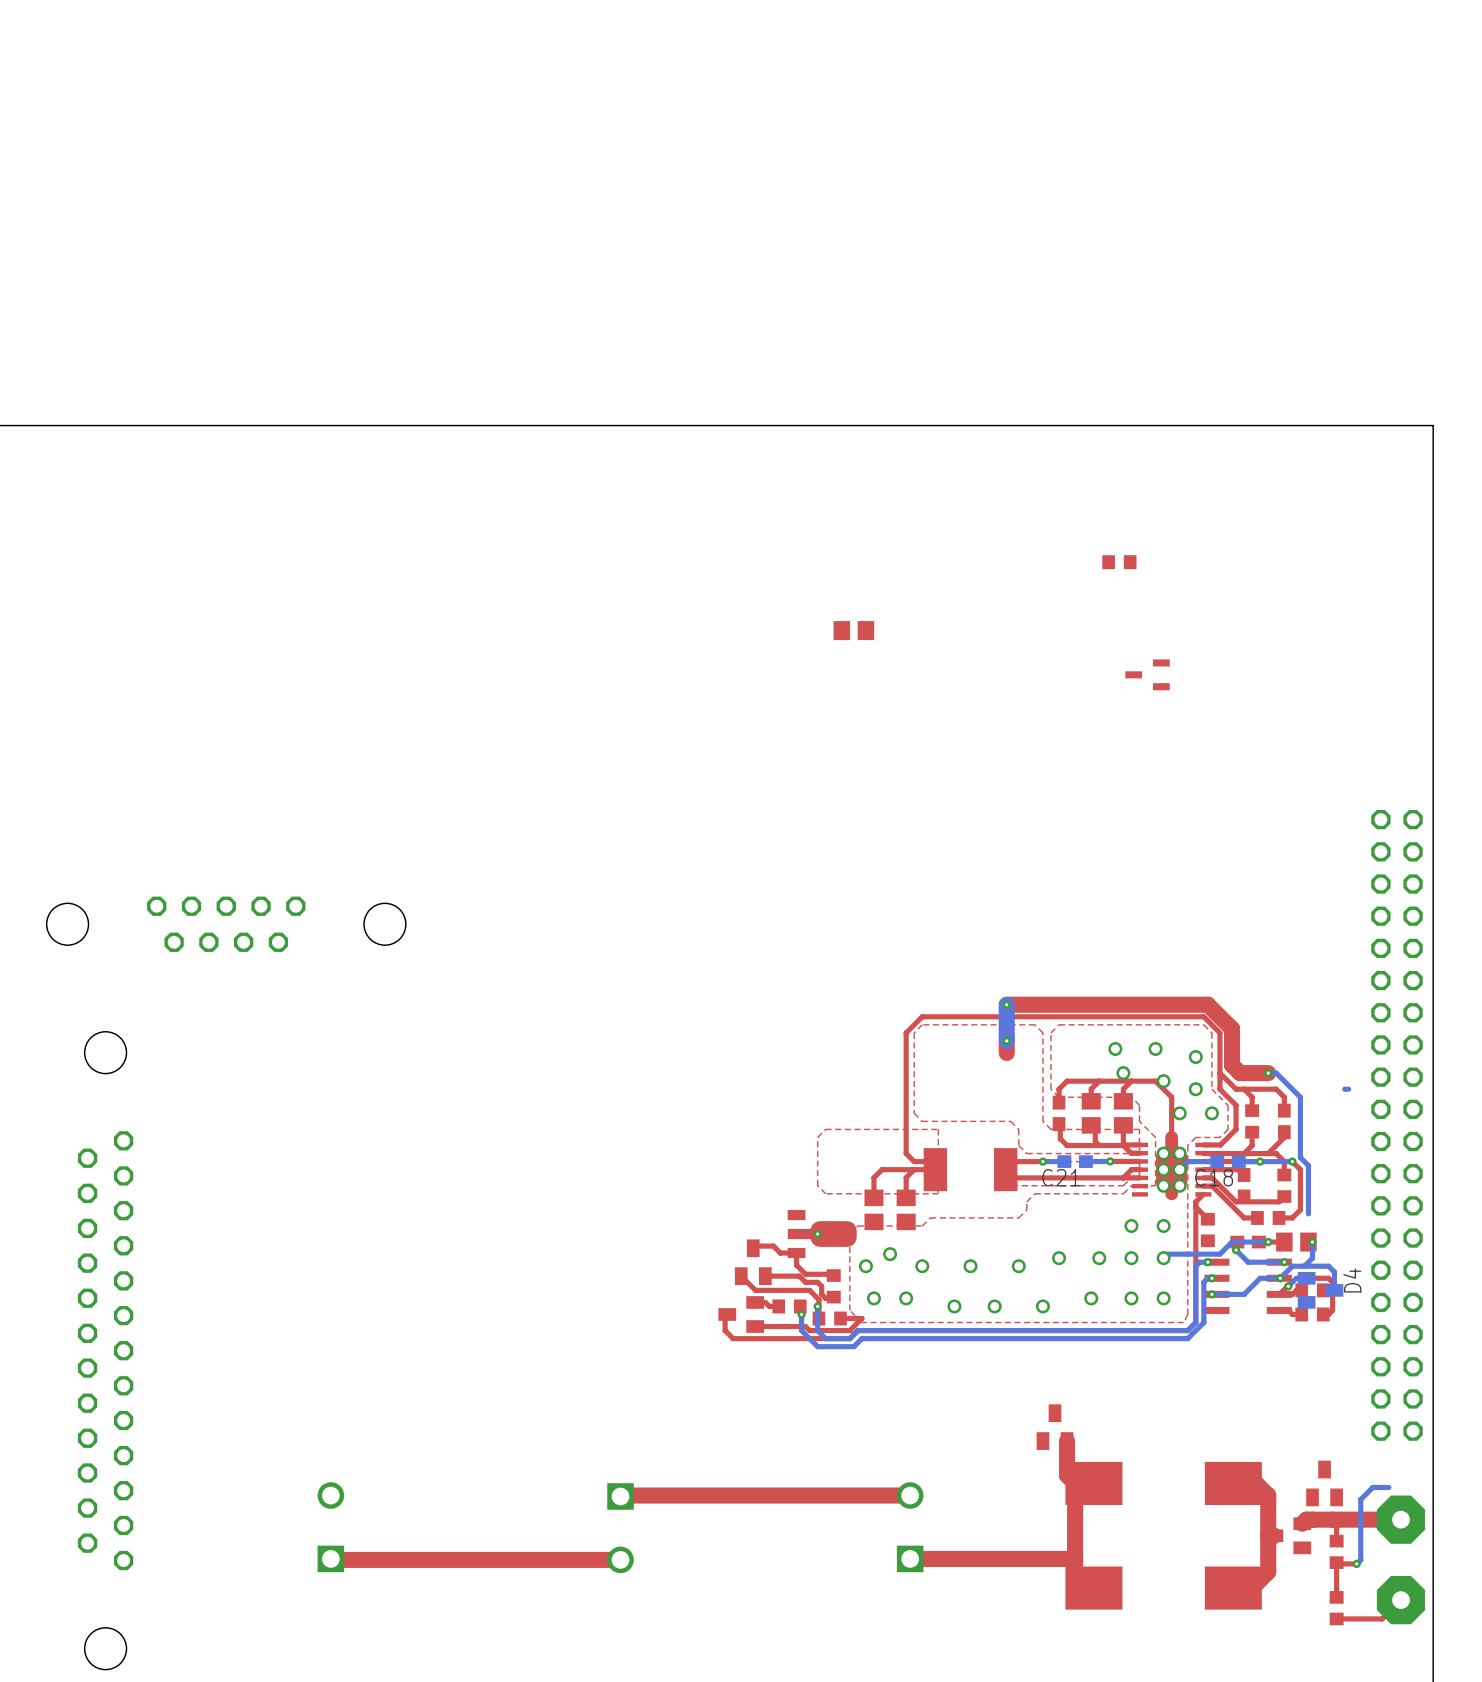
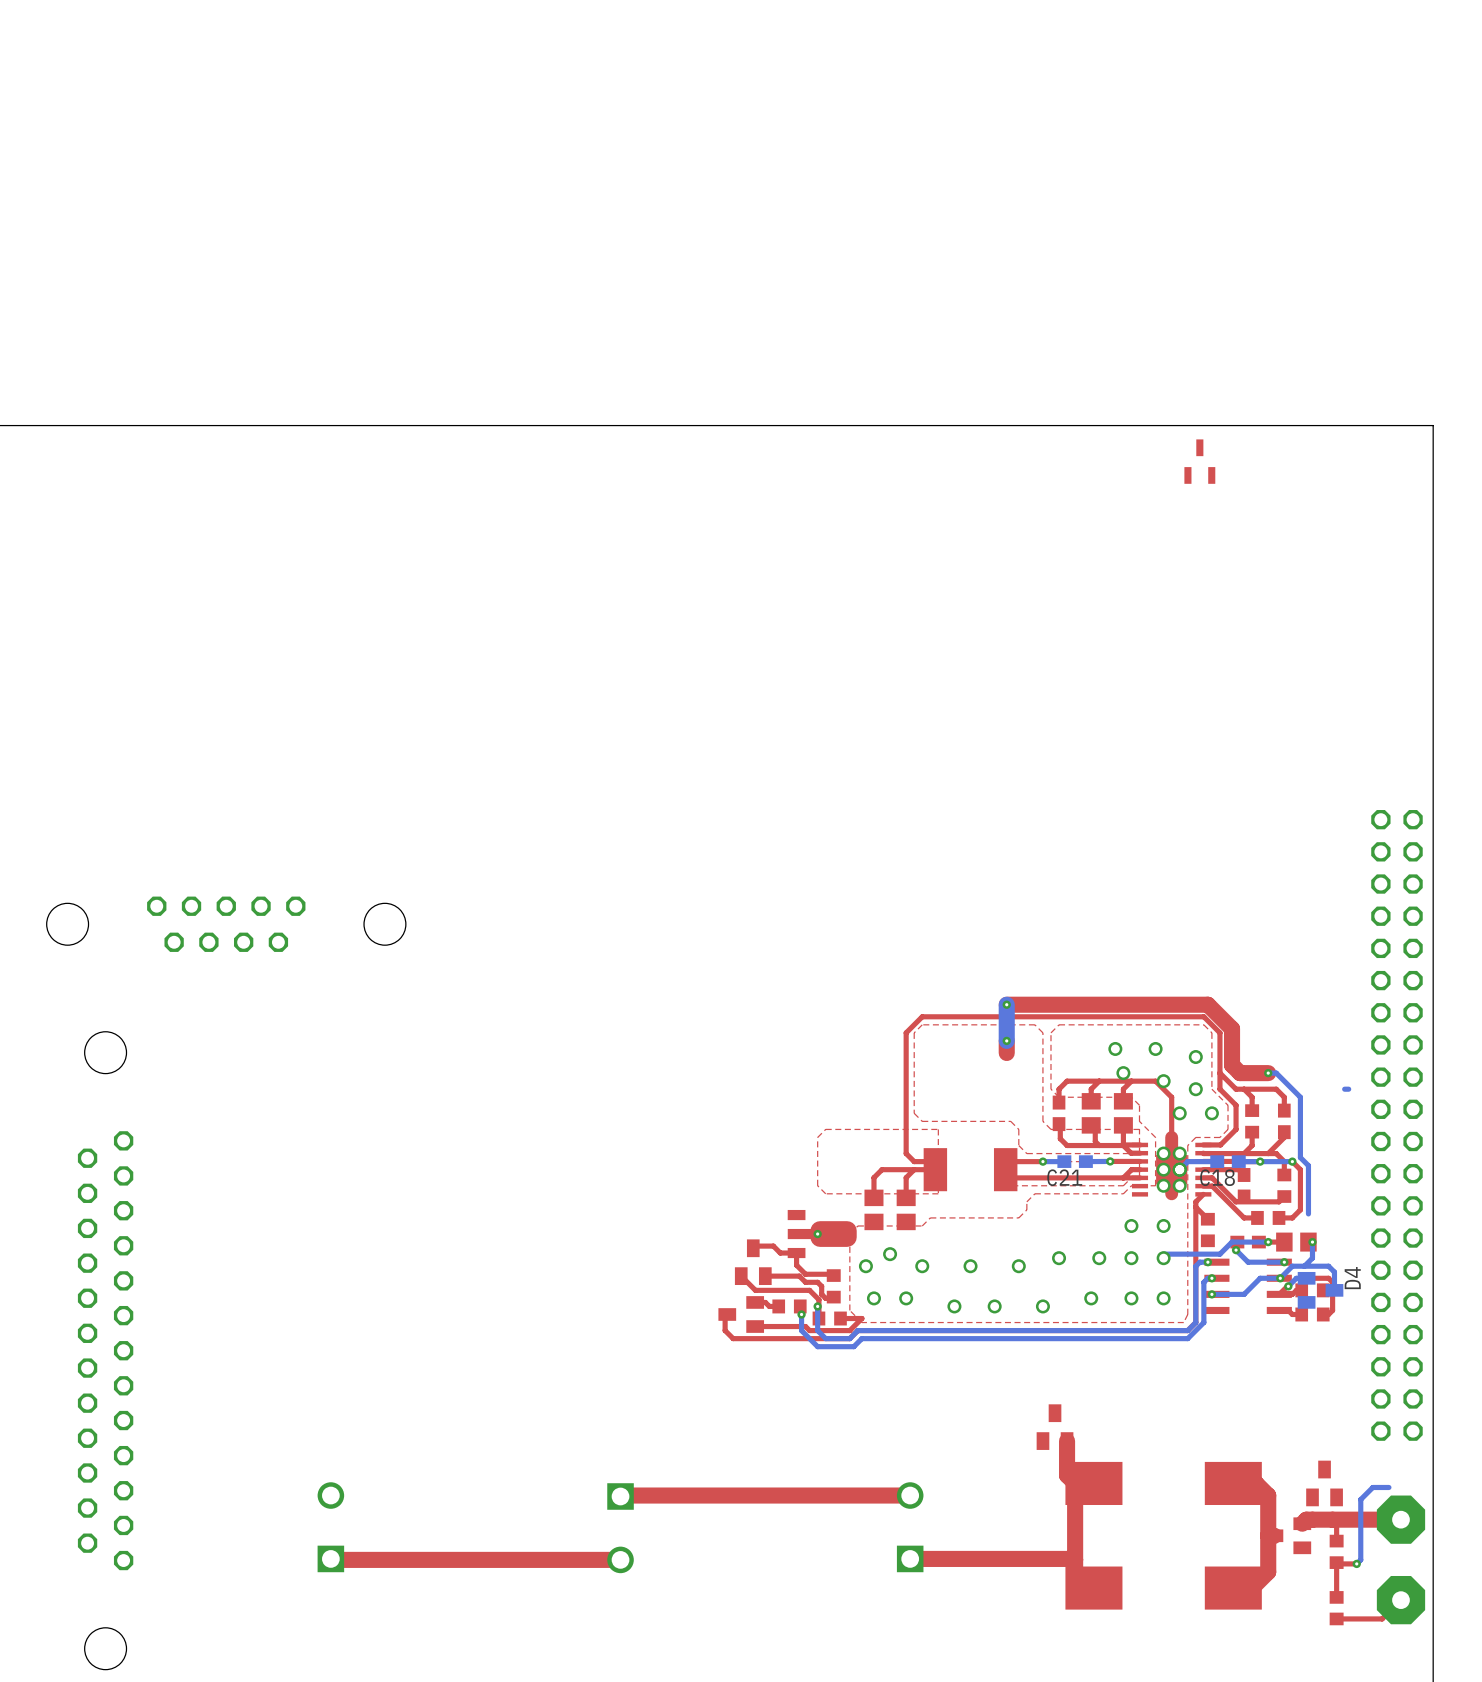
part: (1119, 562) -> none
part: (853, 630) -> none
part rotation: 0° (1147, 674) -> 90° clockwise (1199, 461)
part position: (1147, 674) -> (1199, 461)

